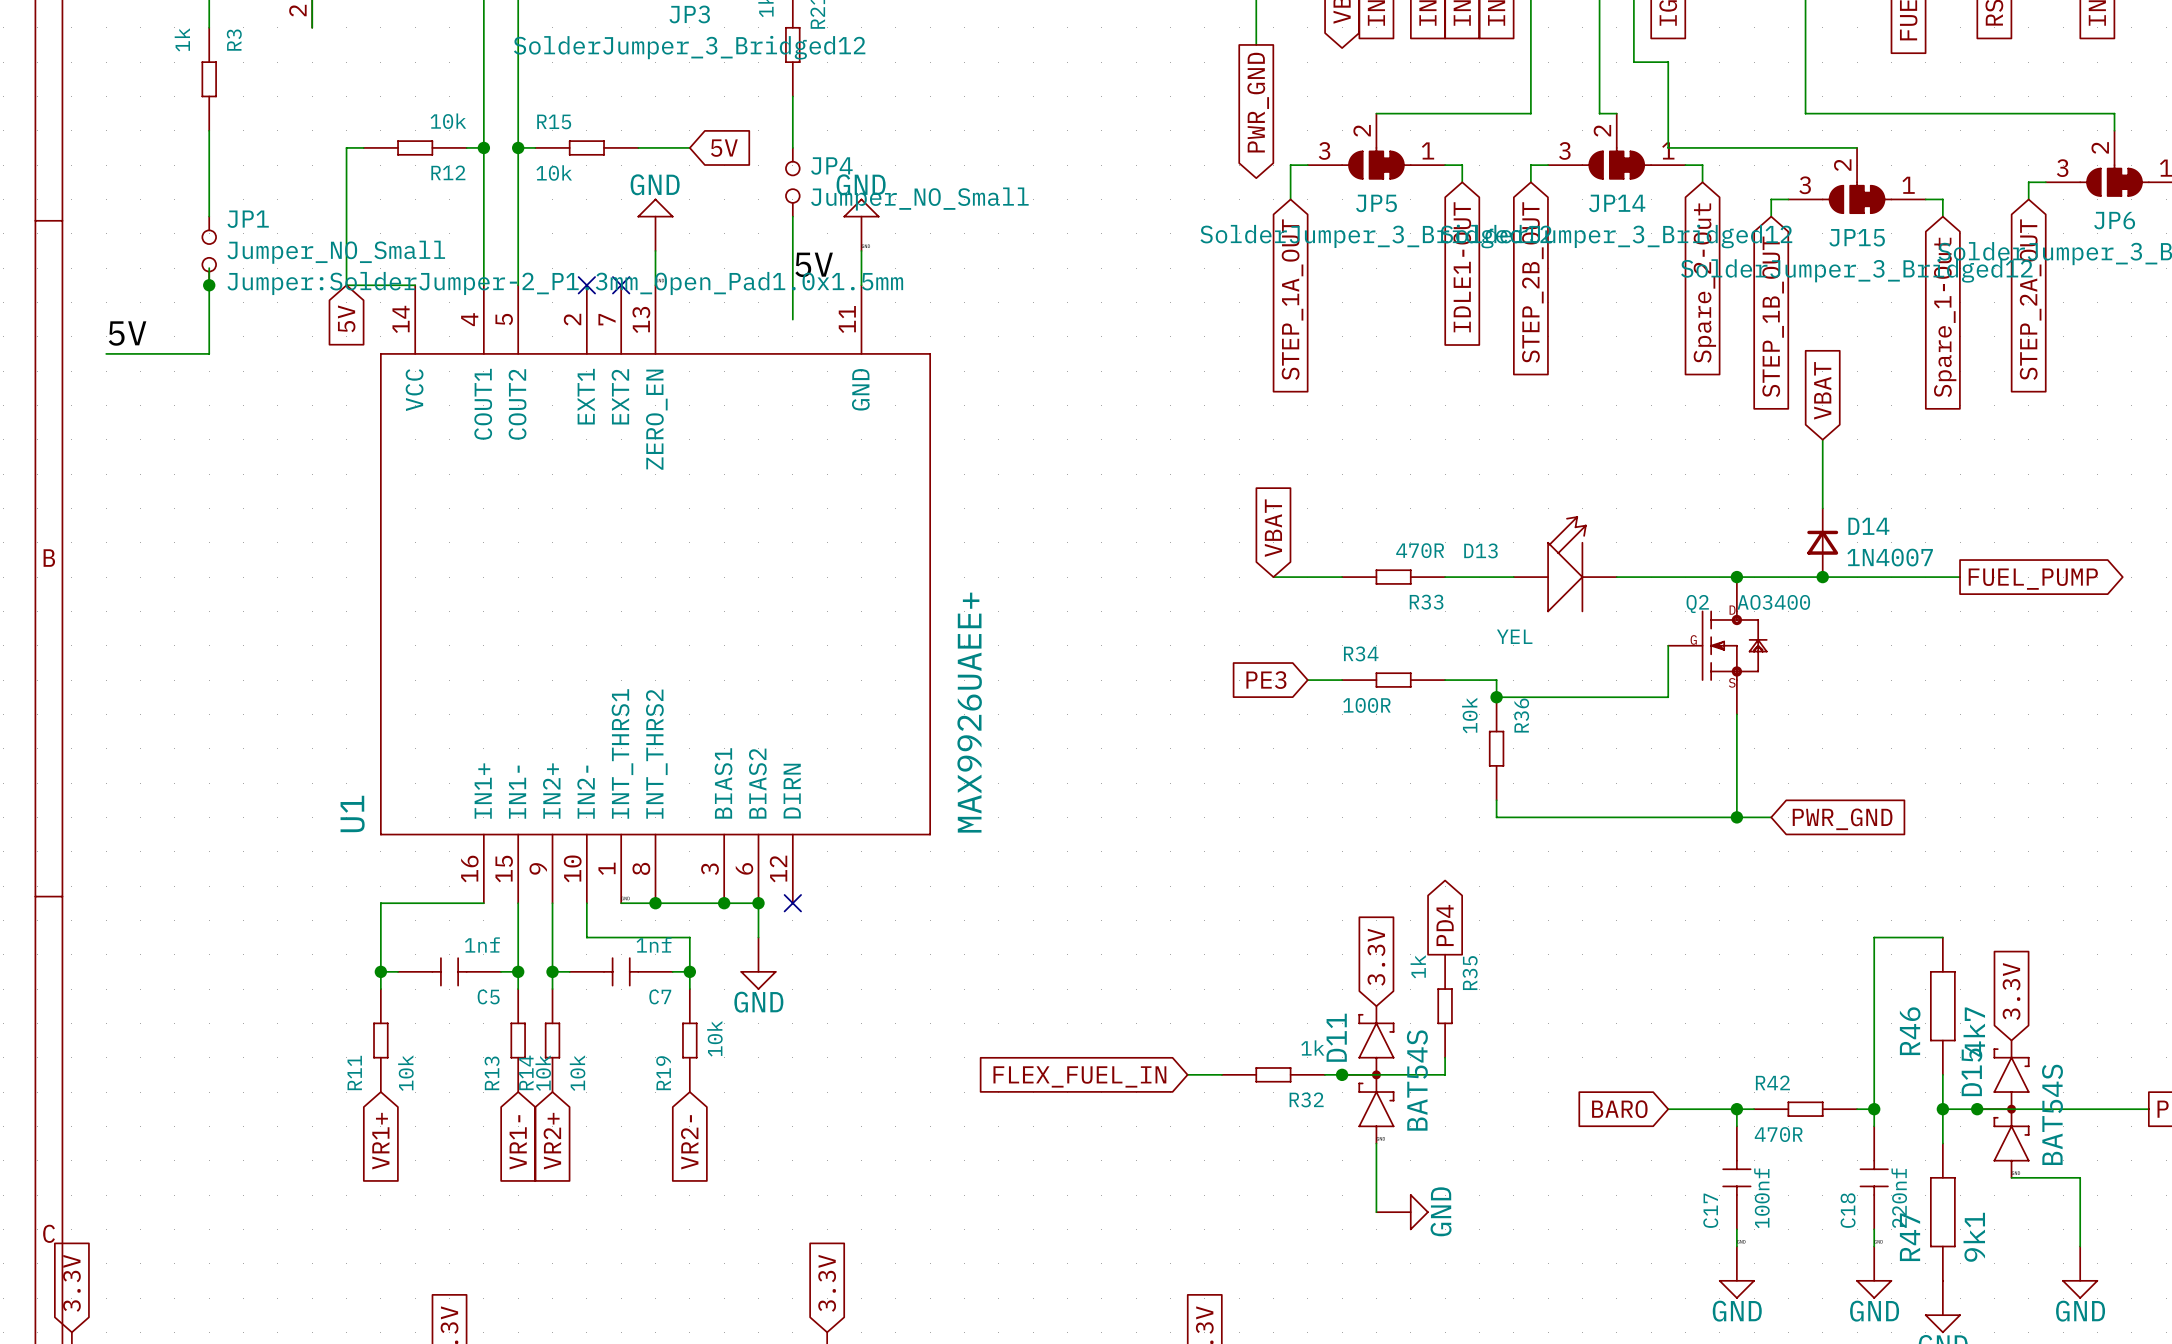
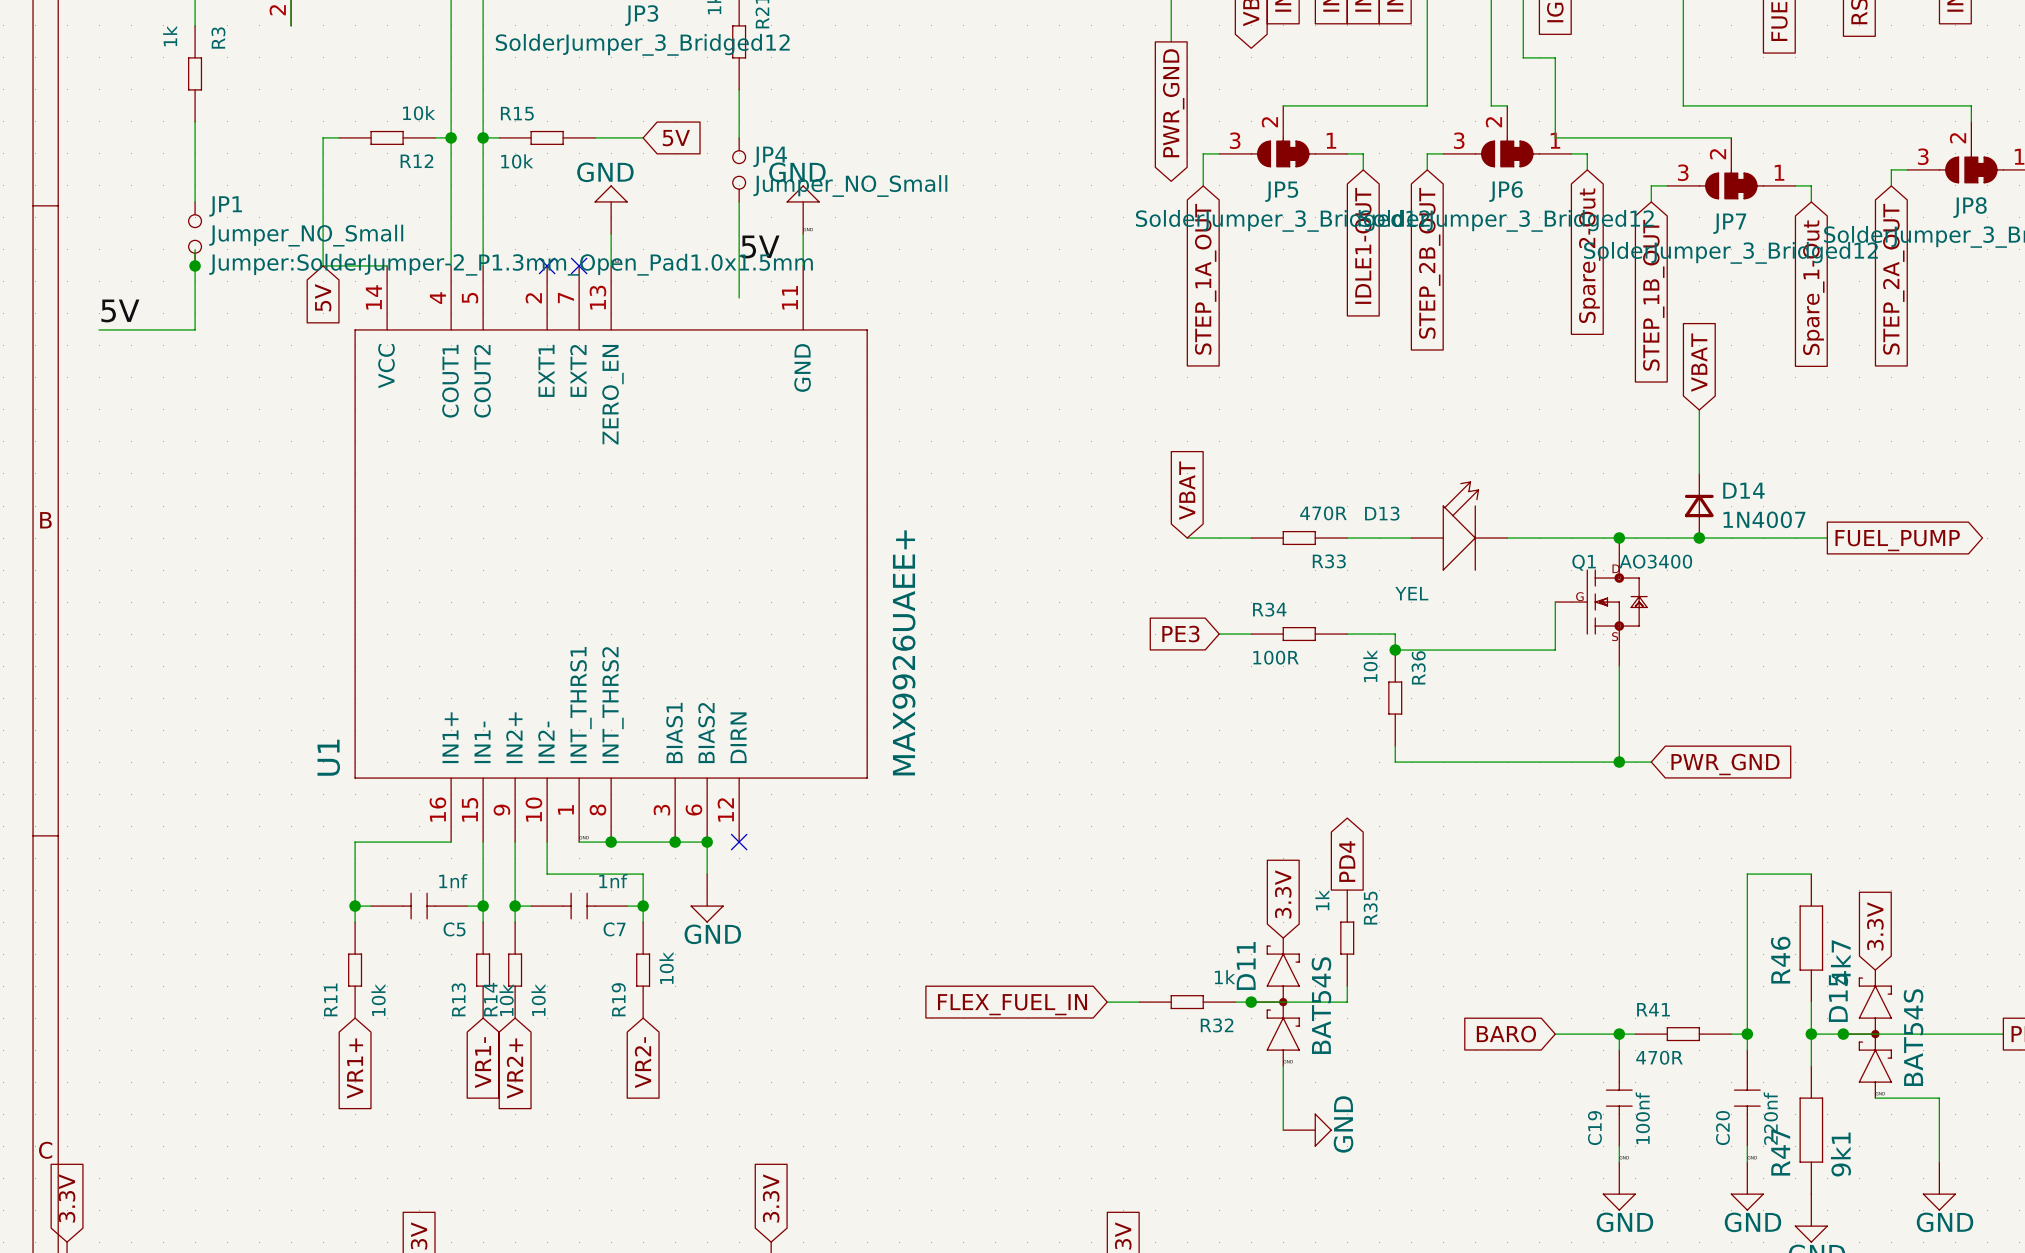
JP14 name: JP14 (1617, 203) -> JP6 (1506, 191)
JP6 name: JP6 (2114, 220) -> JP8 (1970, 207)
JP15 name: JP15 (1857, 237) -> JP7 (1729, 223)
Q2 name: Q2 (1697, 604) -> Q1 (1584, 562)
R42 name: R42 (1772, 1082) -> R41 (1653, 1009)
C17 name: C17 (1710, 1210) -> C19 (1594, 1128)
C18 name: C18 (1848, 1210) -> C20 (1722, 1128)

